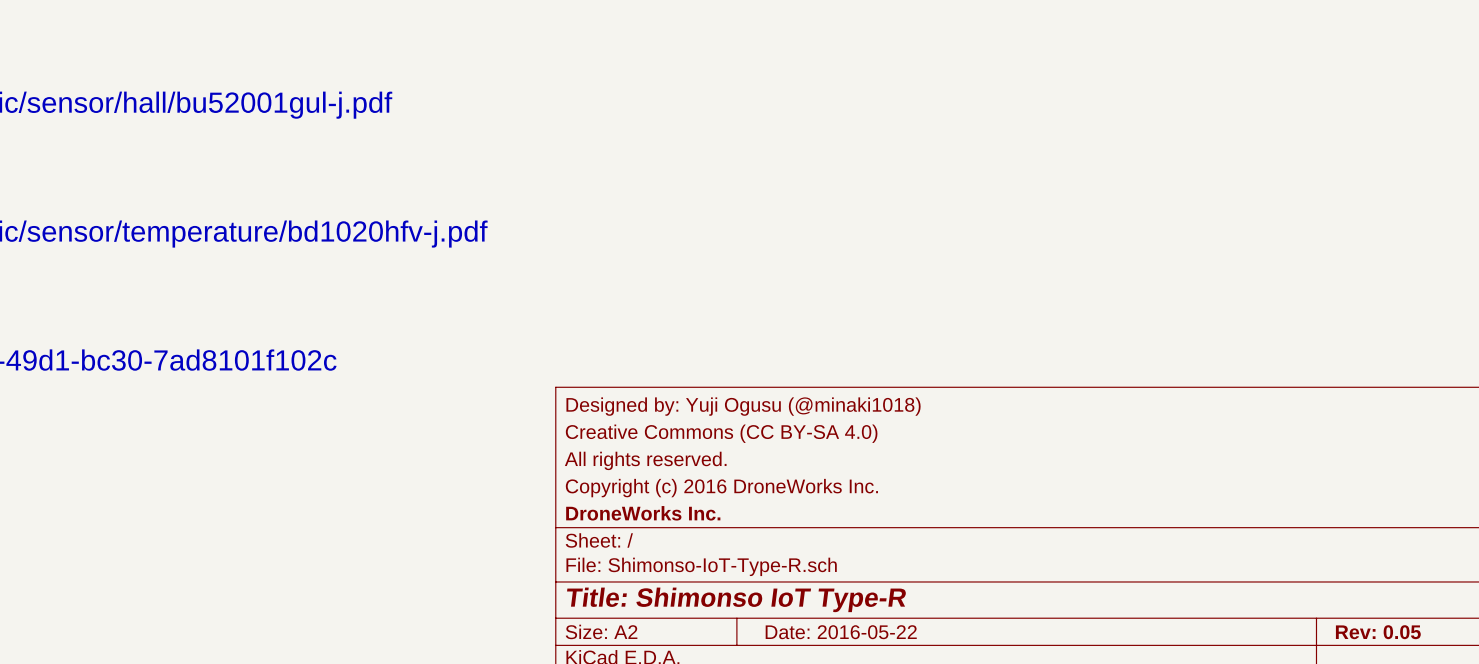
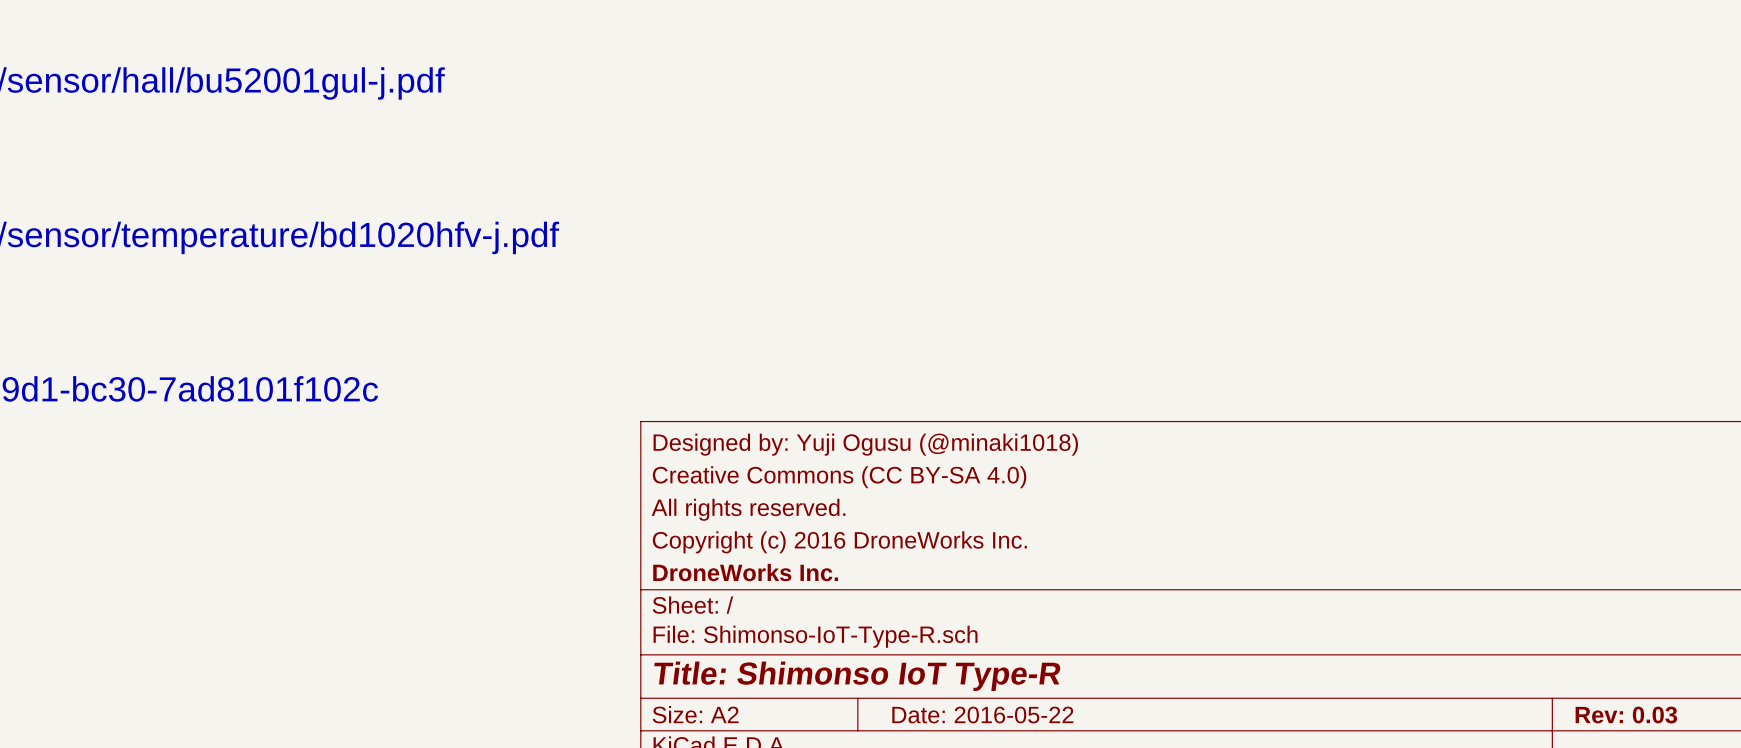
title block: Rev: 0.05 (1378, 632) -> Rev: 0.03 (1626, 715)

